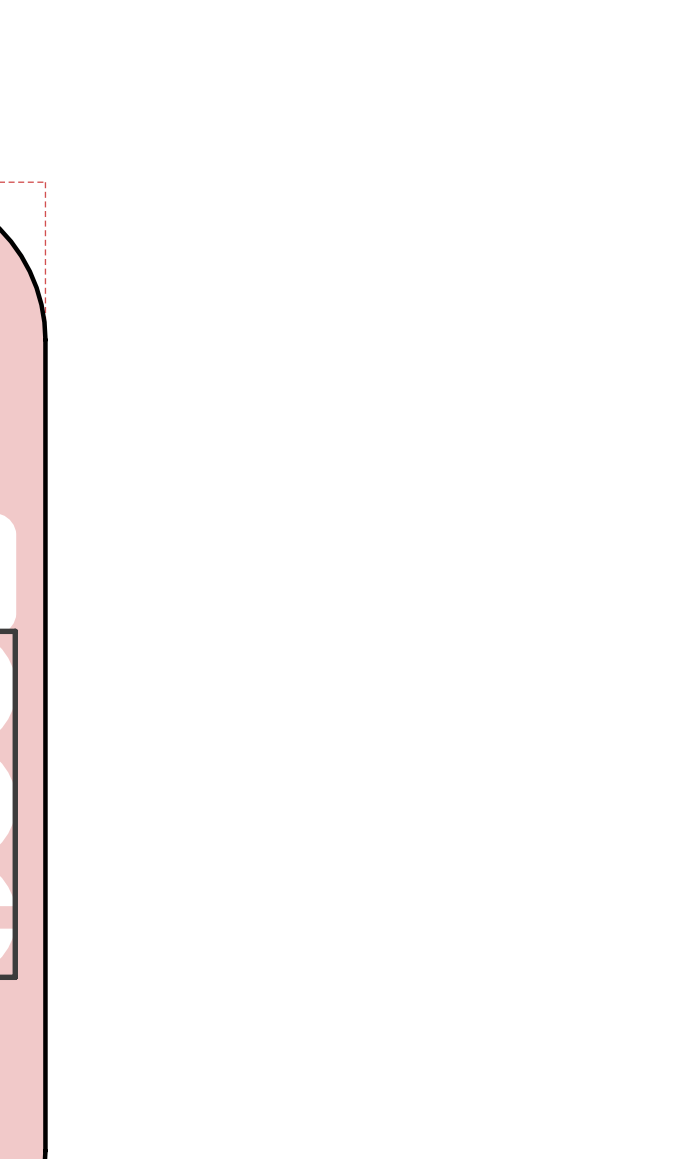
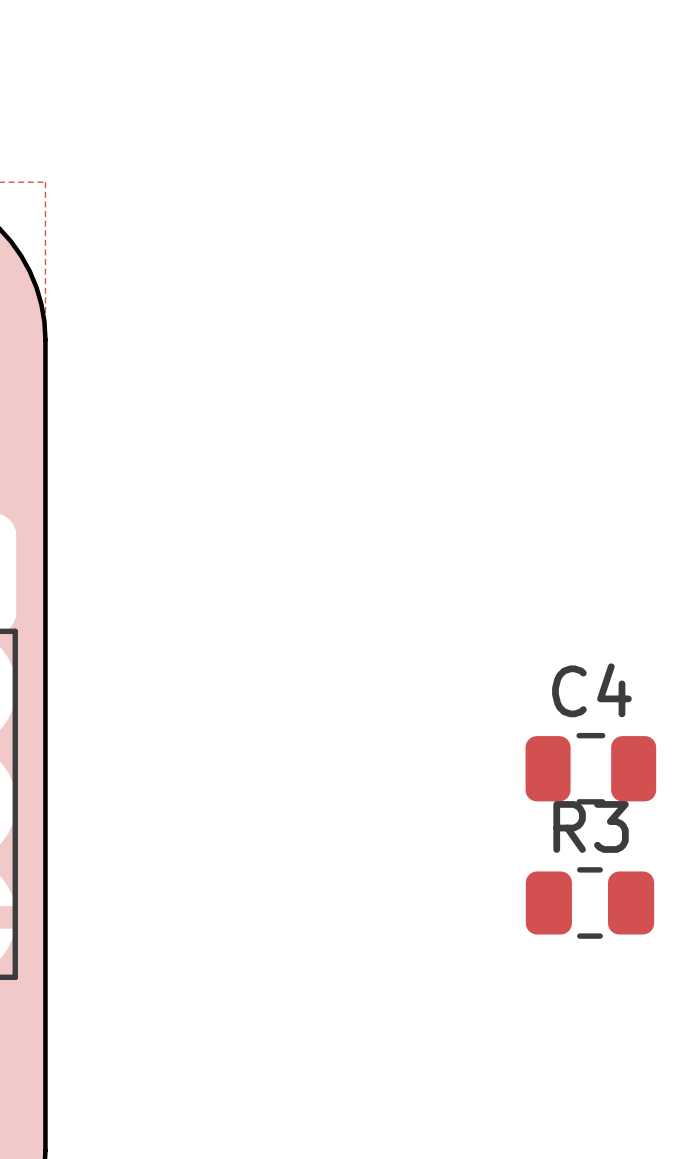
C4: none -> (590, 768)
R3: none -> (589, 902)

